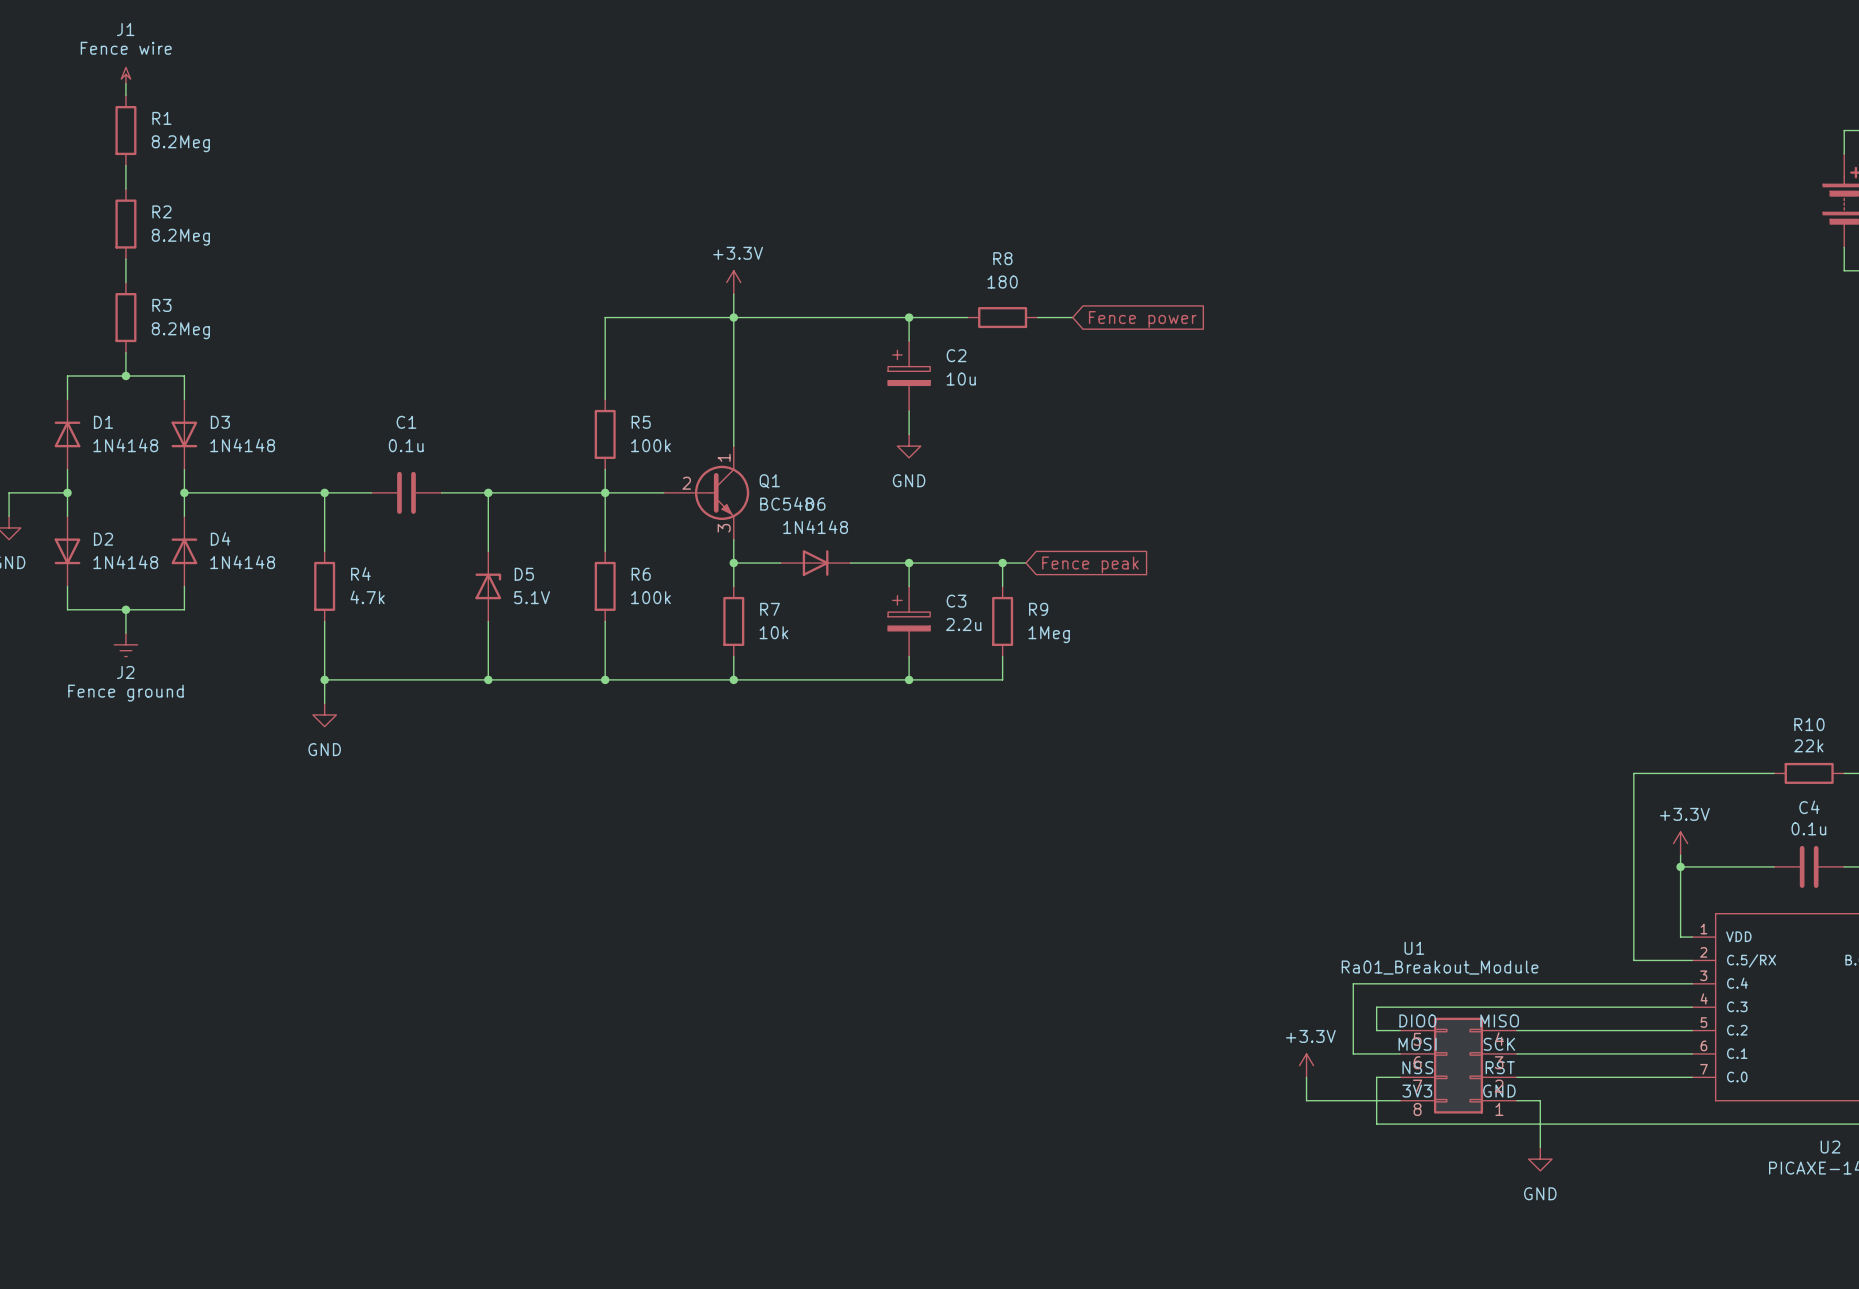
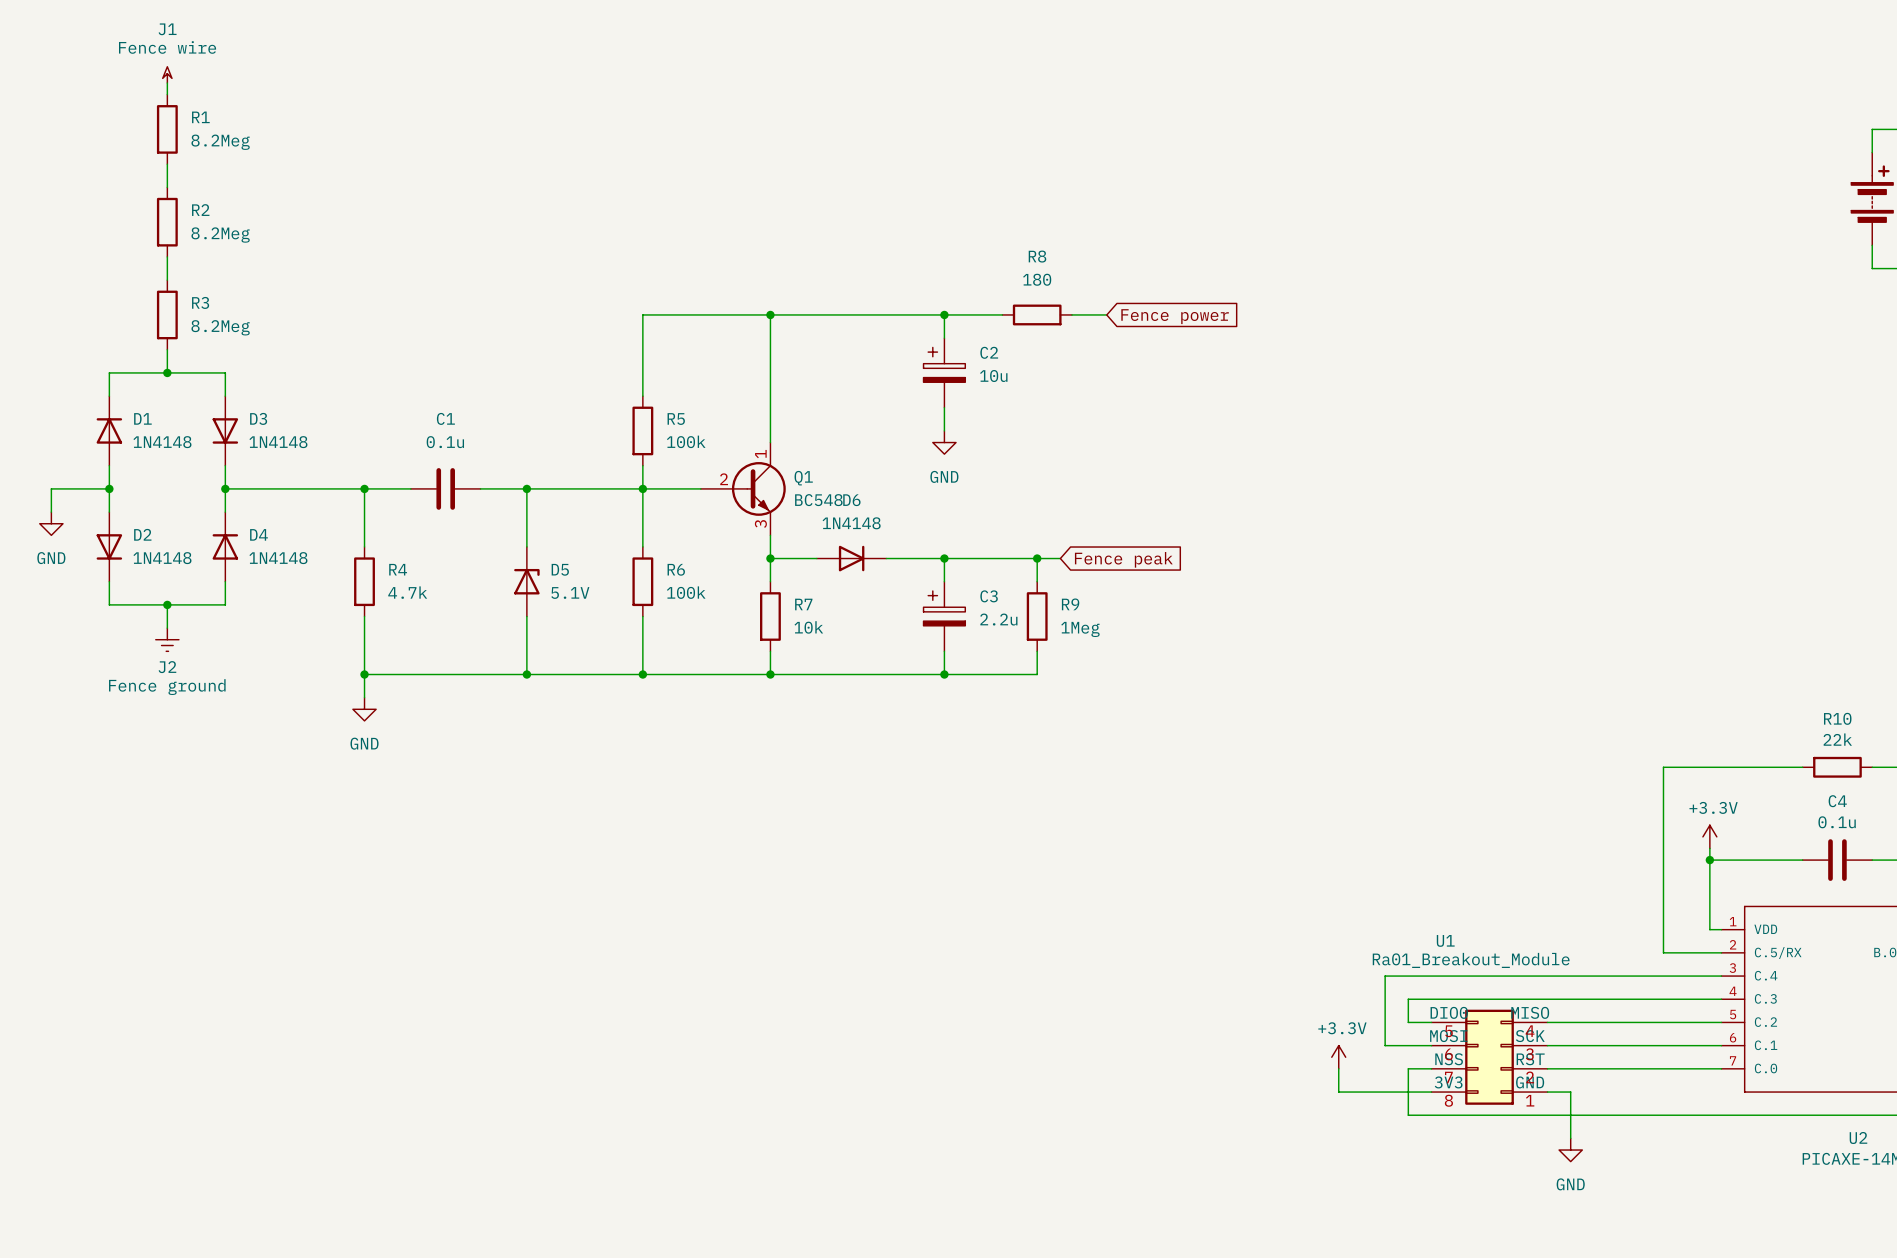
power symbol: +3.3V (733, 282) -> none
wire: (733, 294) (733, 317) -> none

